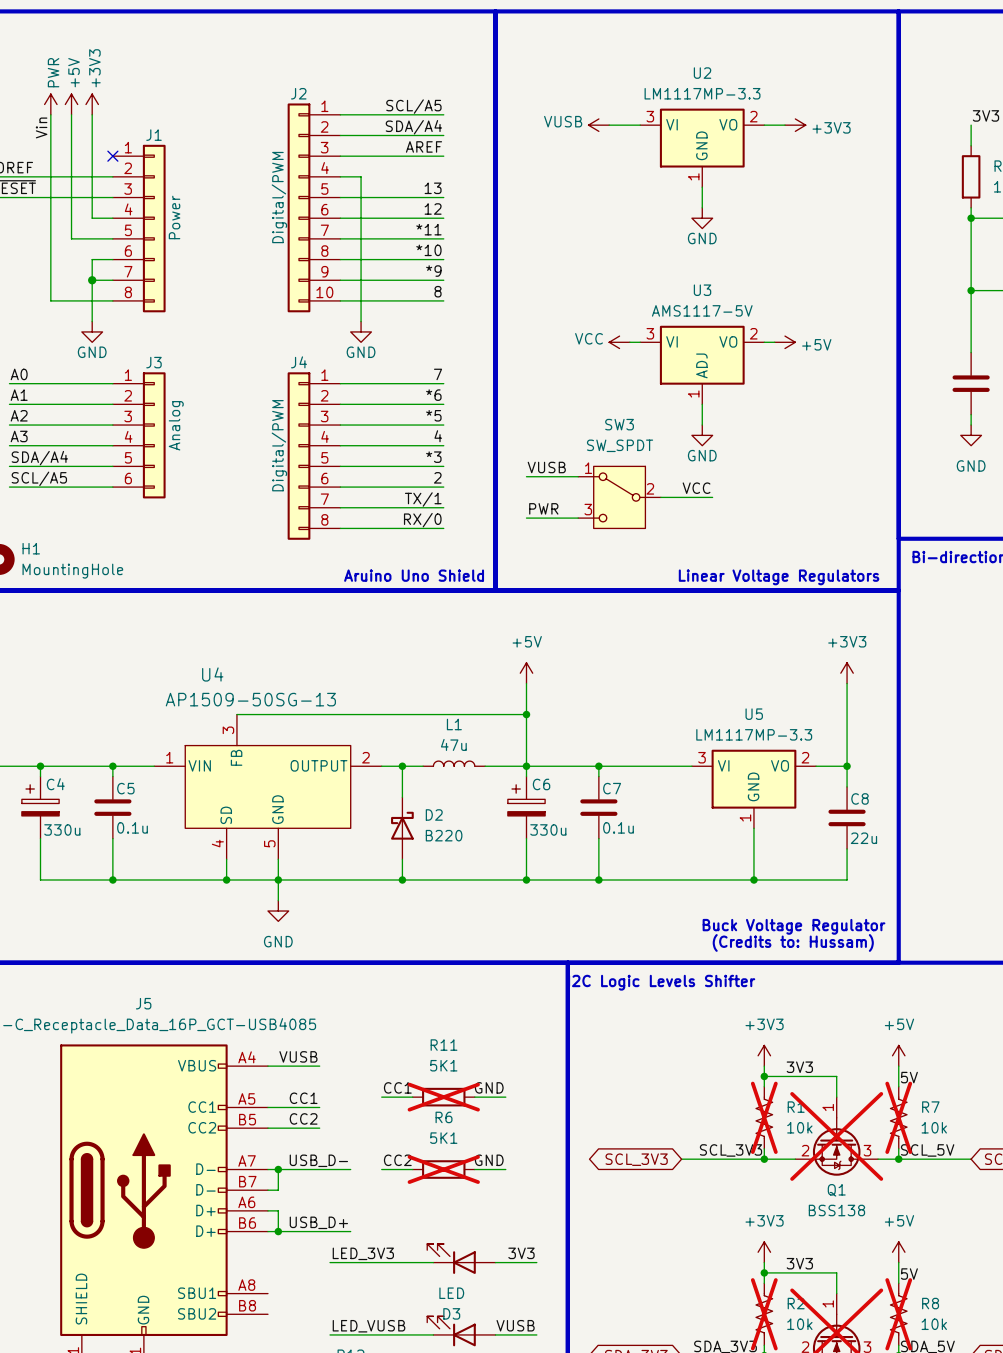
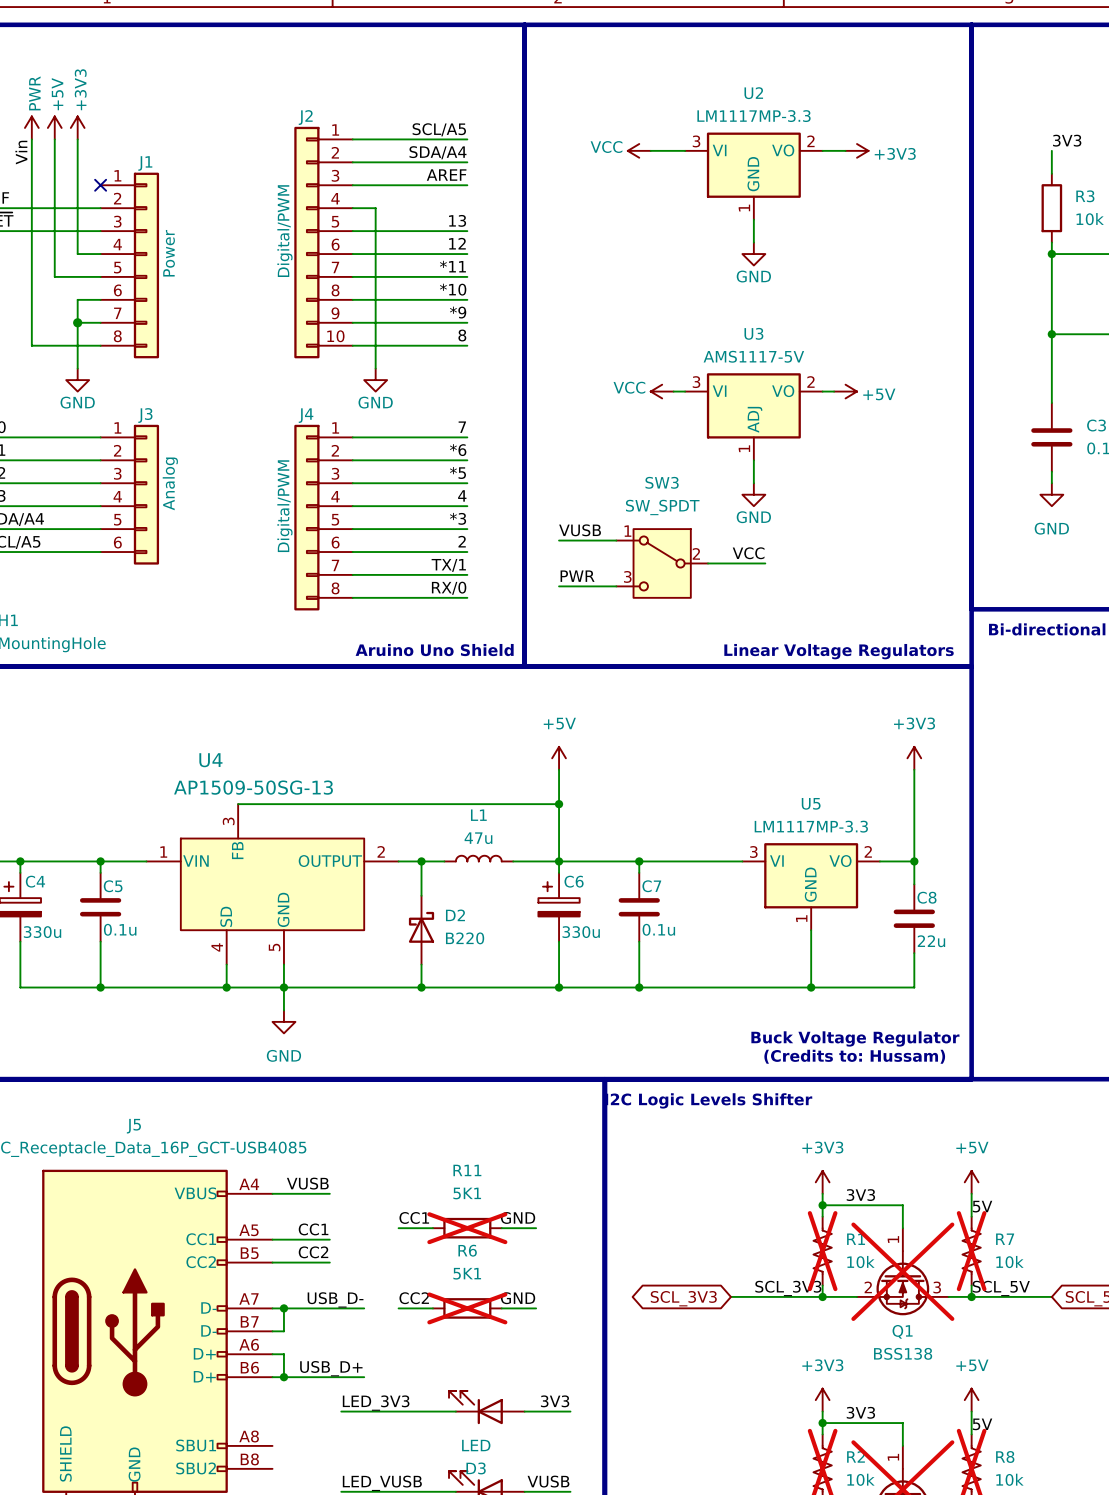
power symbol: VUSB (598, 125) -> VCC (639, 150)

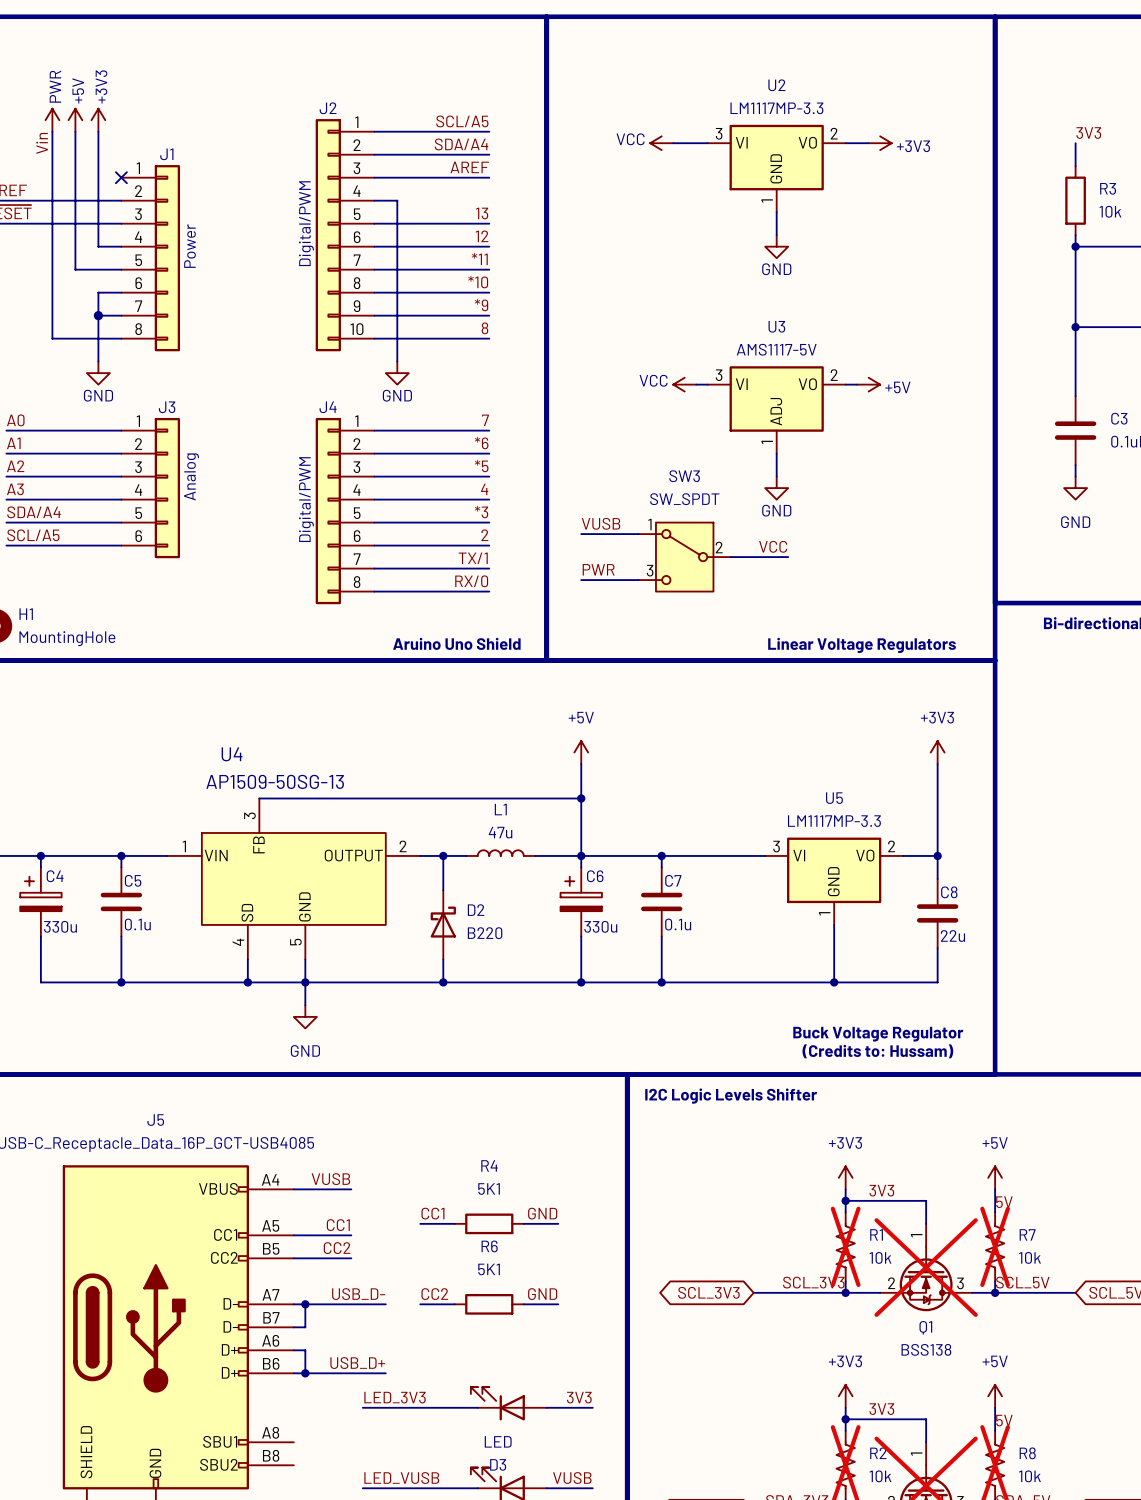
R11 name: R11 (467, 1170) -> R4 (489, 1165)
R11 do-not-place cross: (467, 1228) -> none
R6 do-not-place cross: (467, 1308) -> none

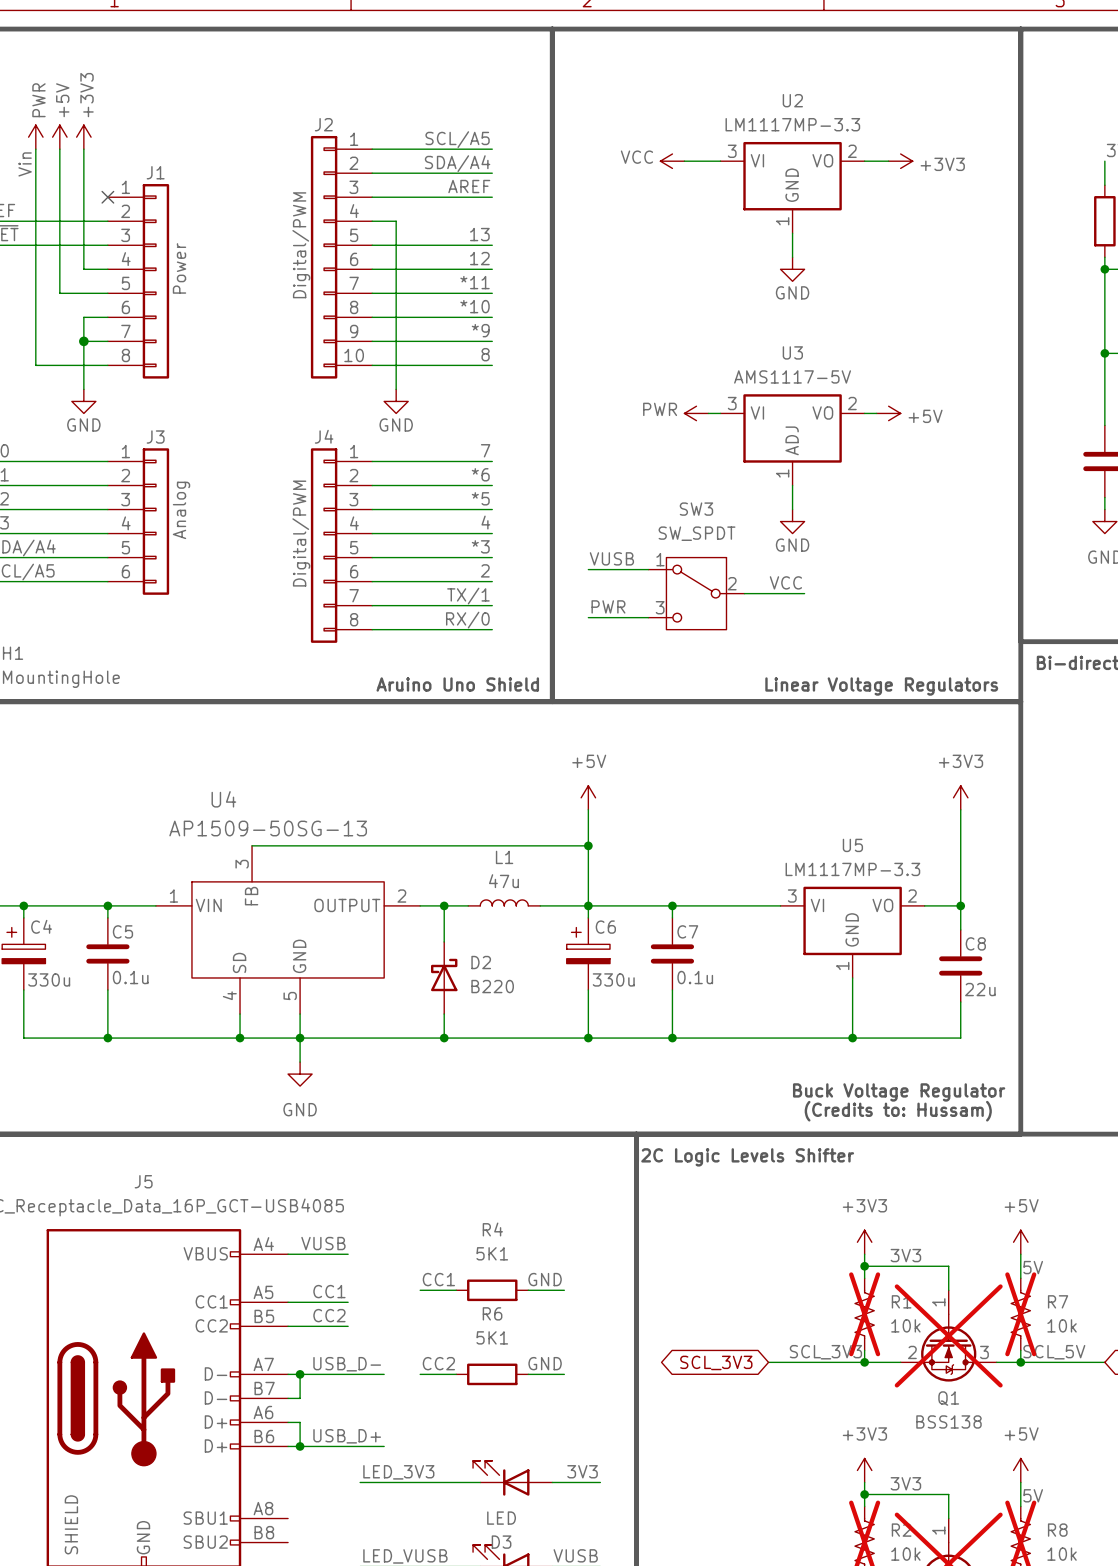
power symbol: VCC (684, 384) -> PWR (696, 413)

